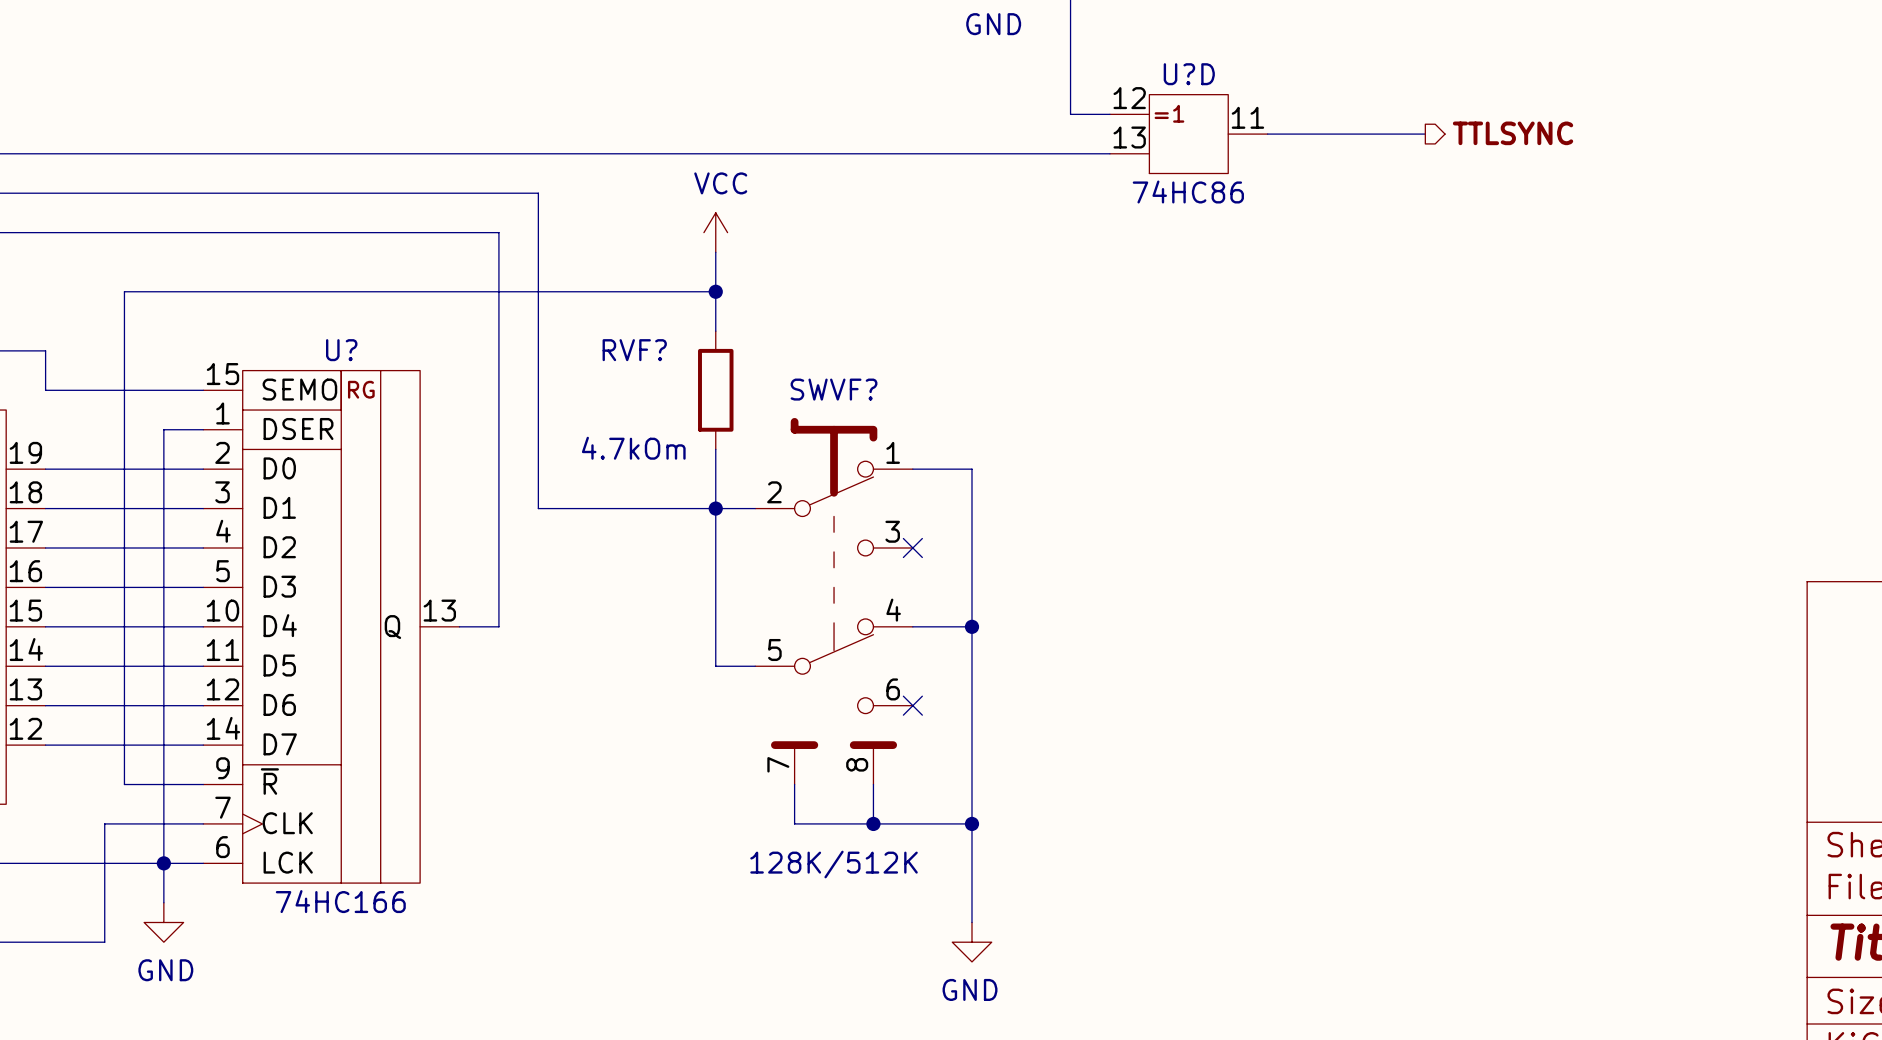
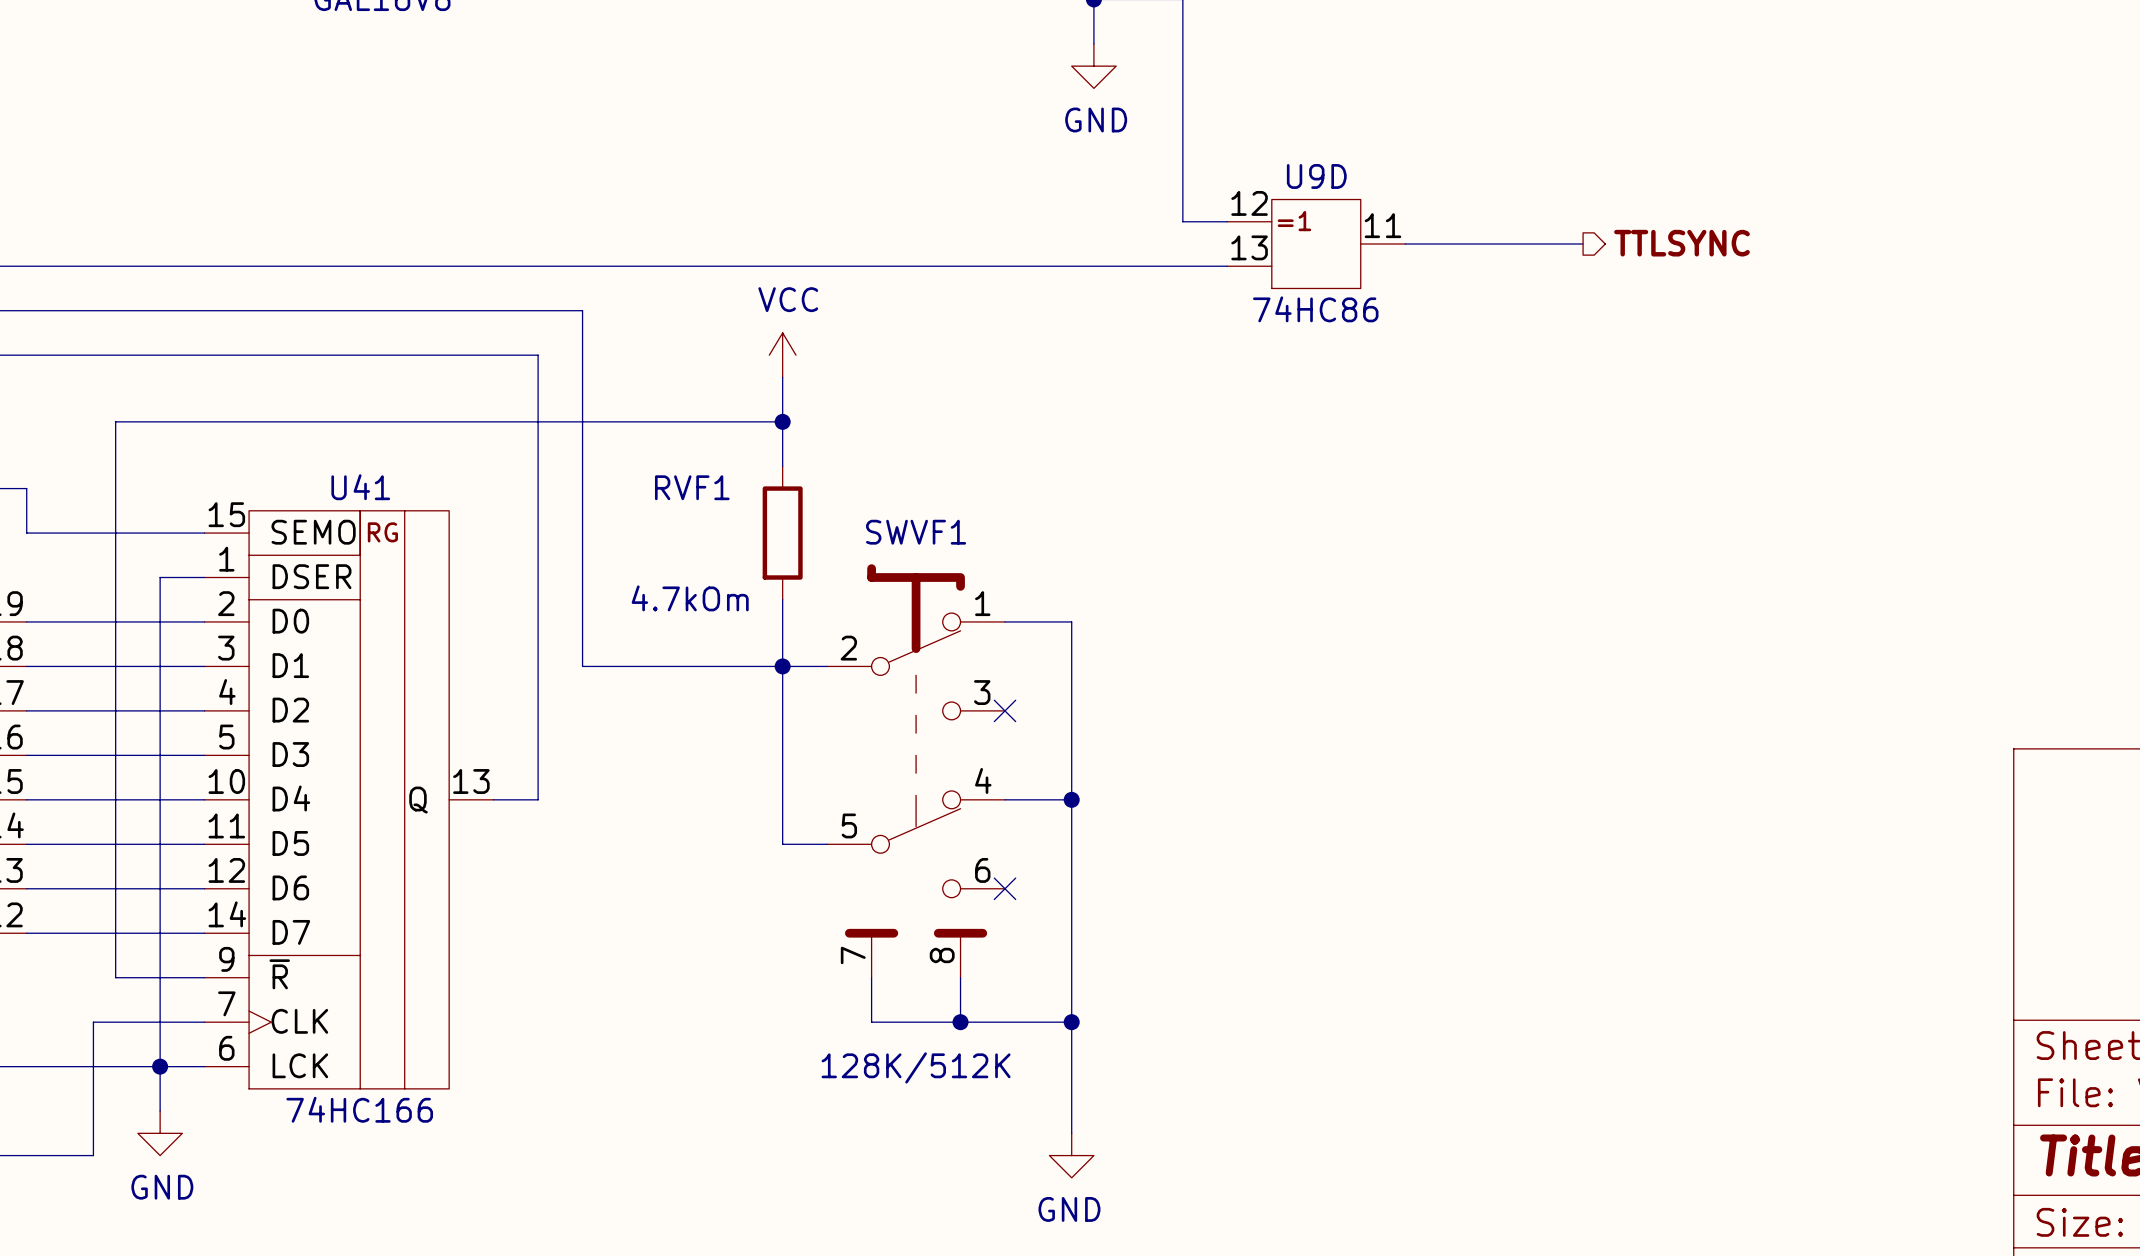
U?D name: U?D (1189, 74) -> U9D (1316, 176)
U? name: U? (341, 350) -> U41 (360, 487)
RVF? name: RVF? (634, 350) -> RVF1 (692, 487)
SWVF? name: SWVF? (834, 389) -> SWVF1 (916, 532)

